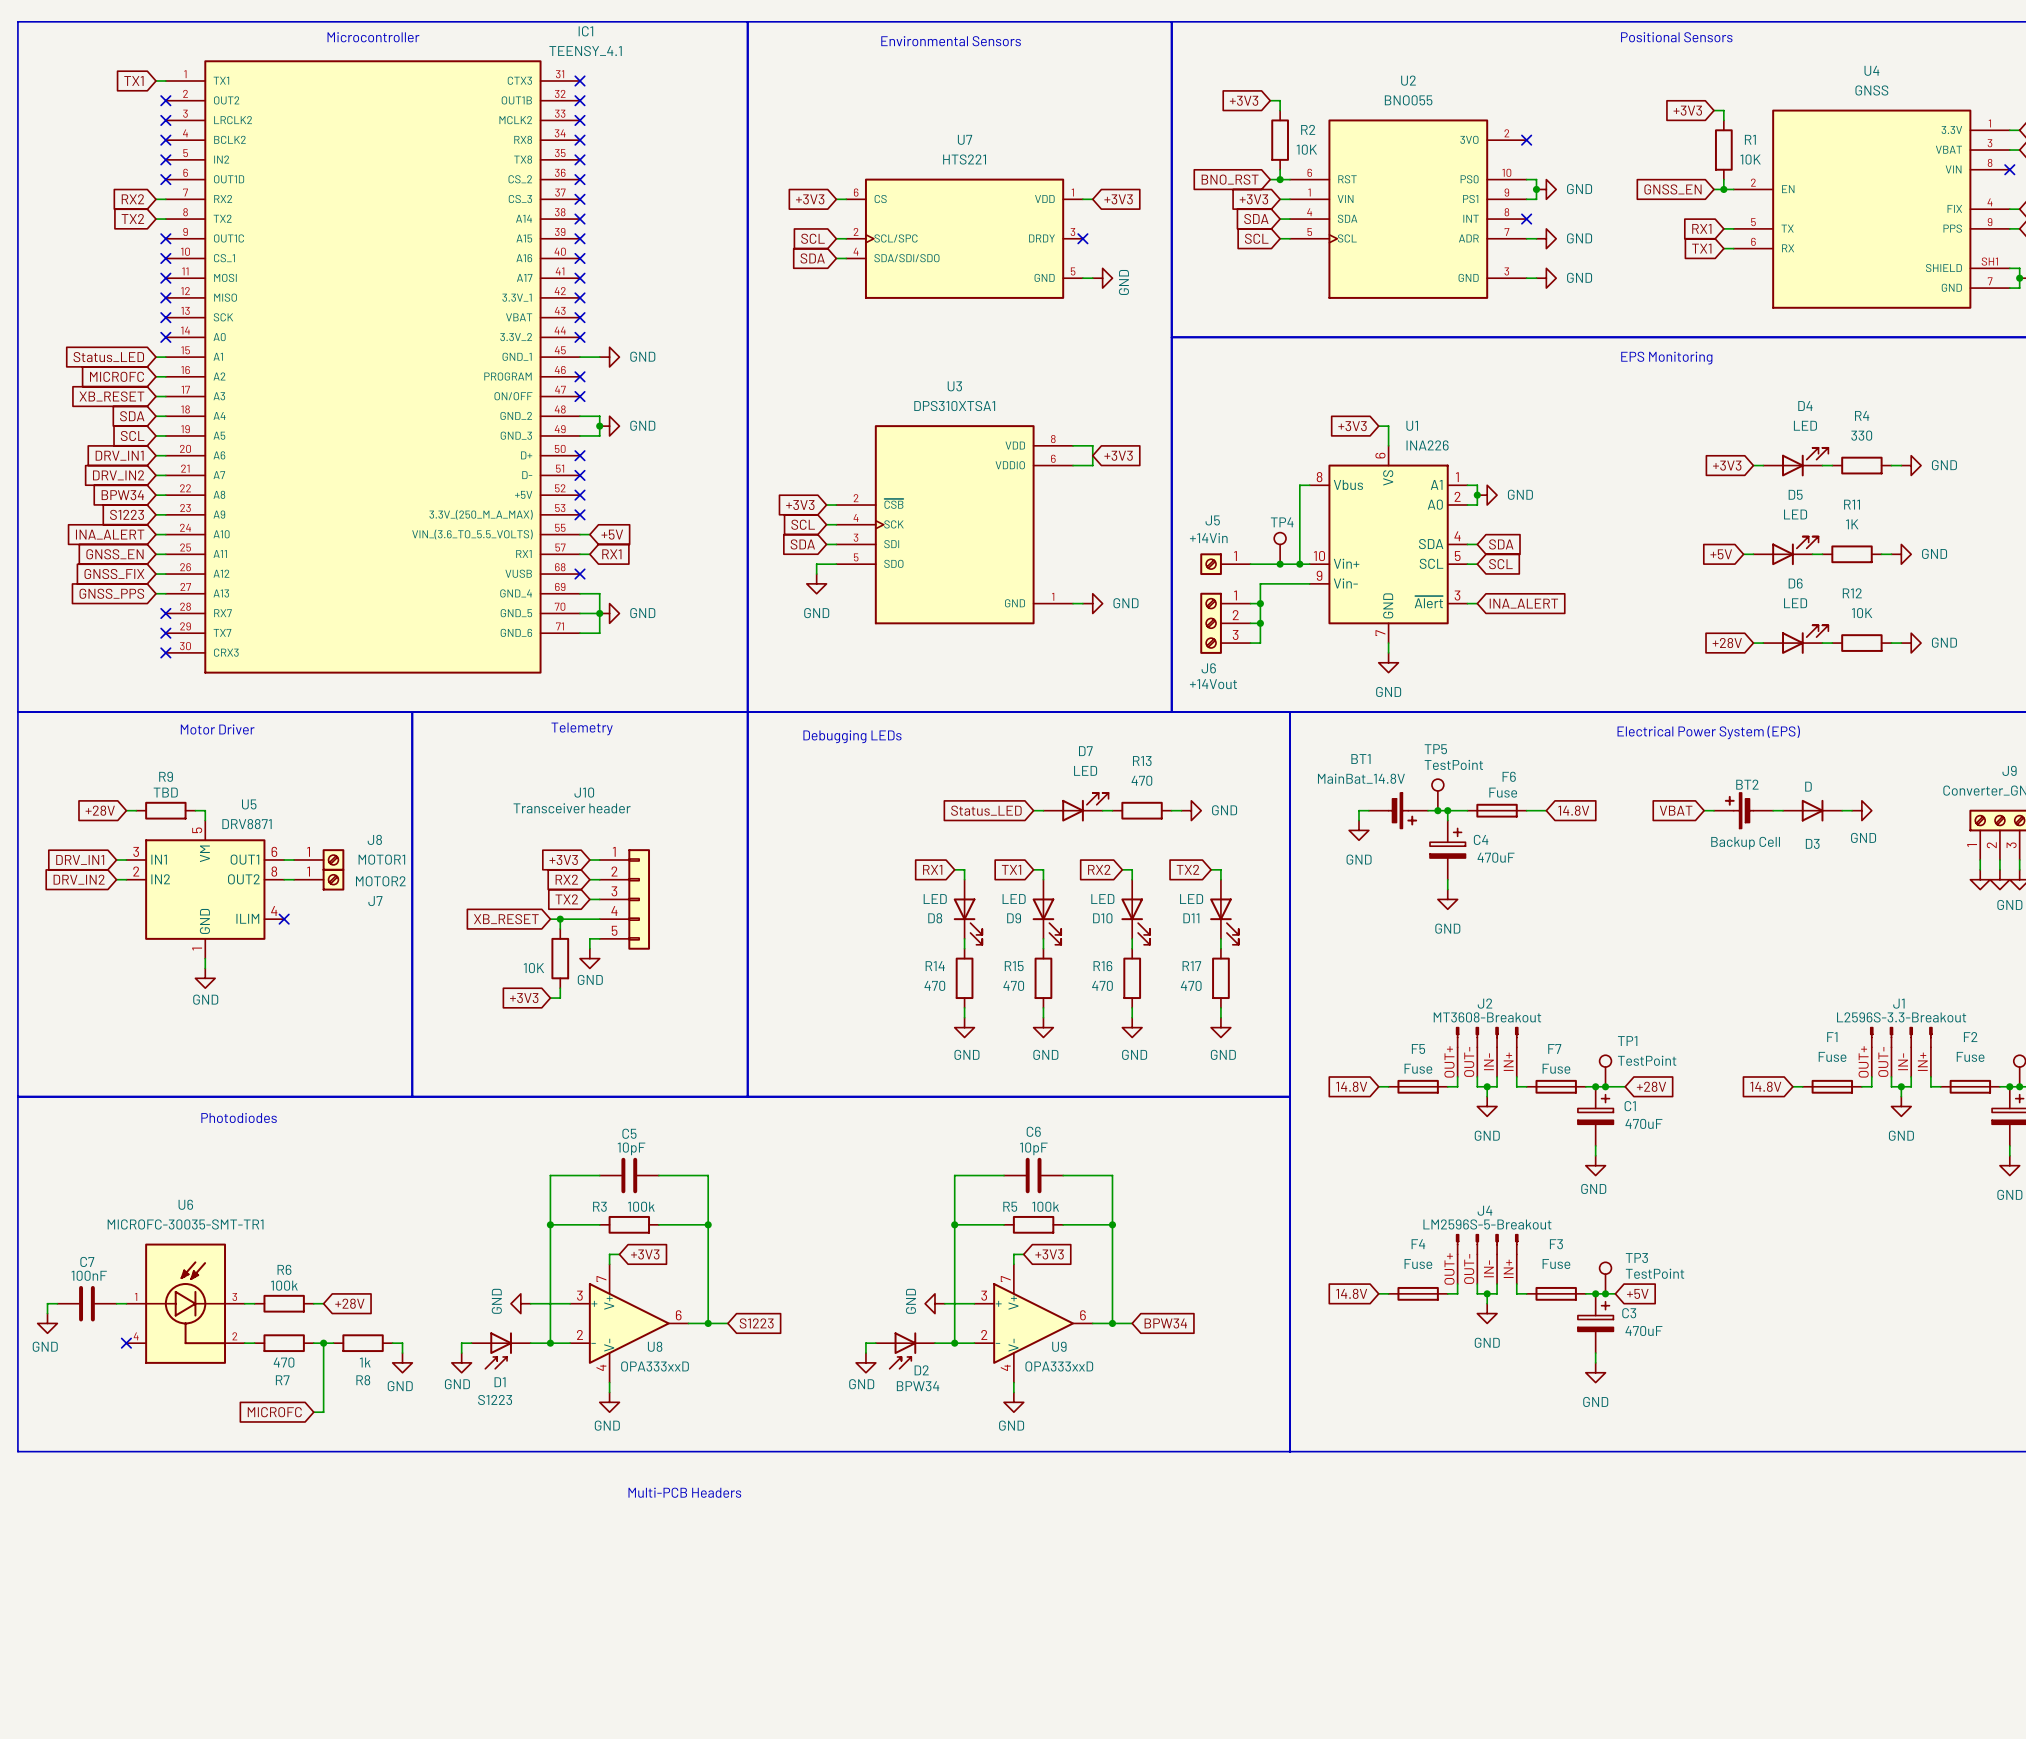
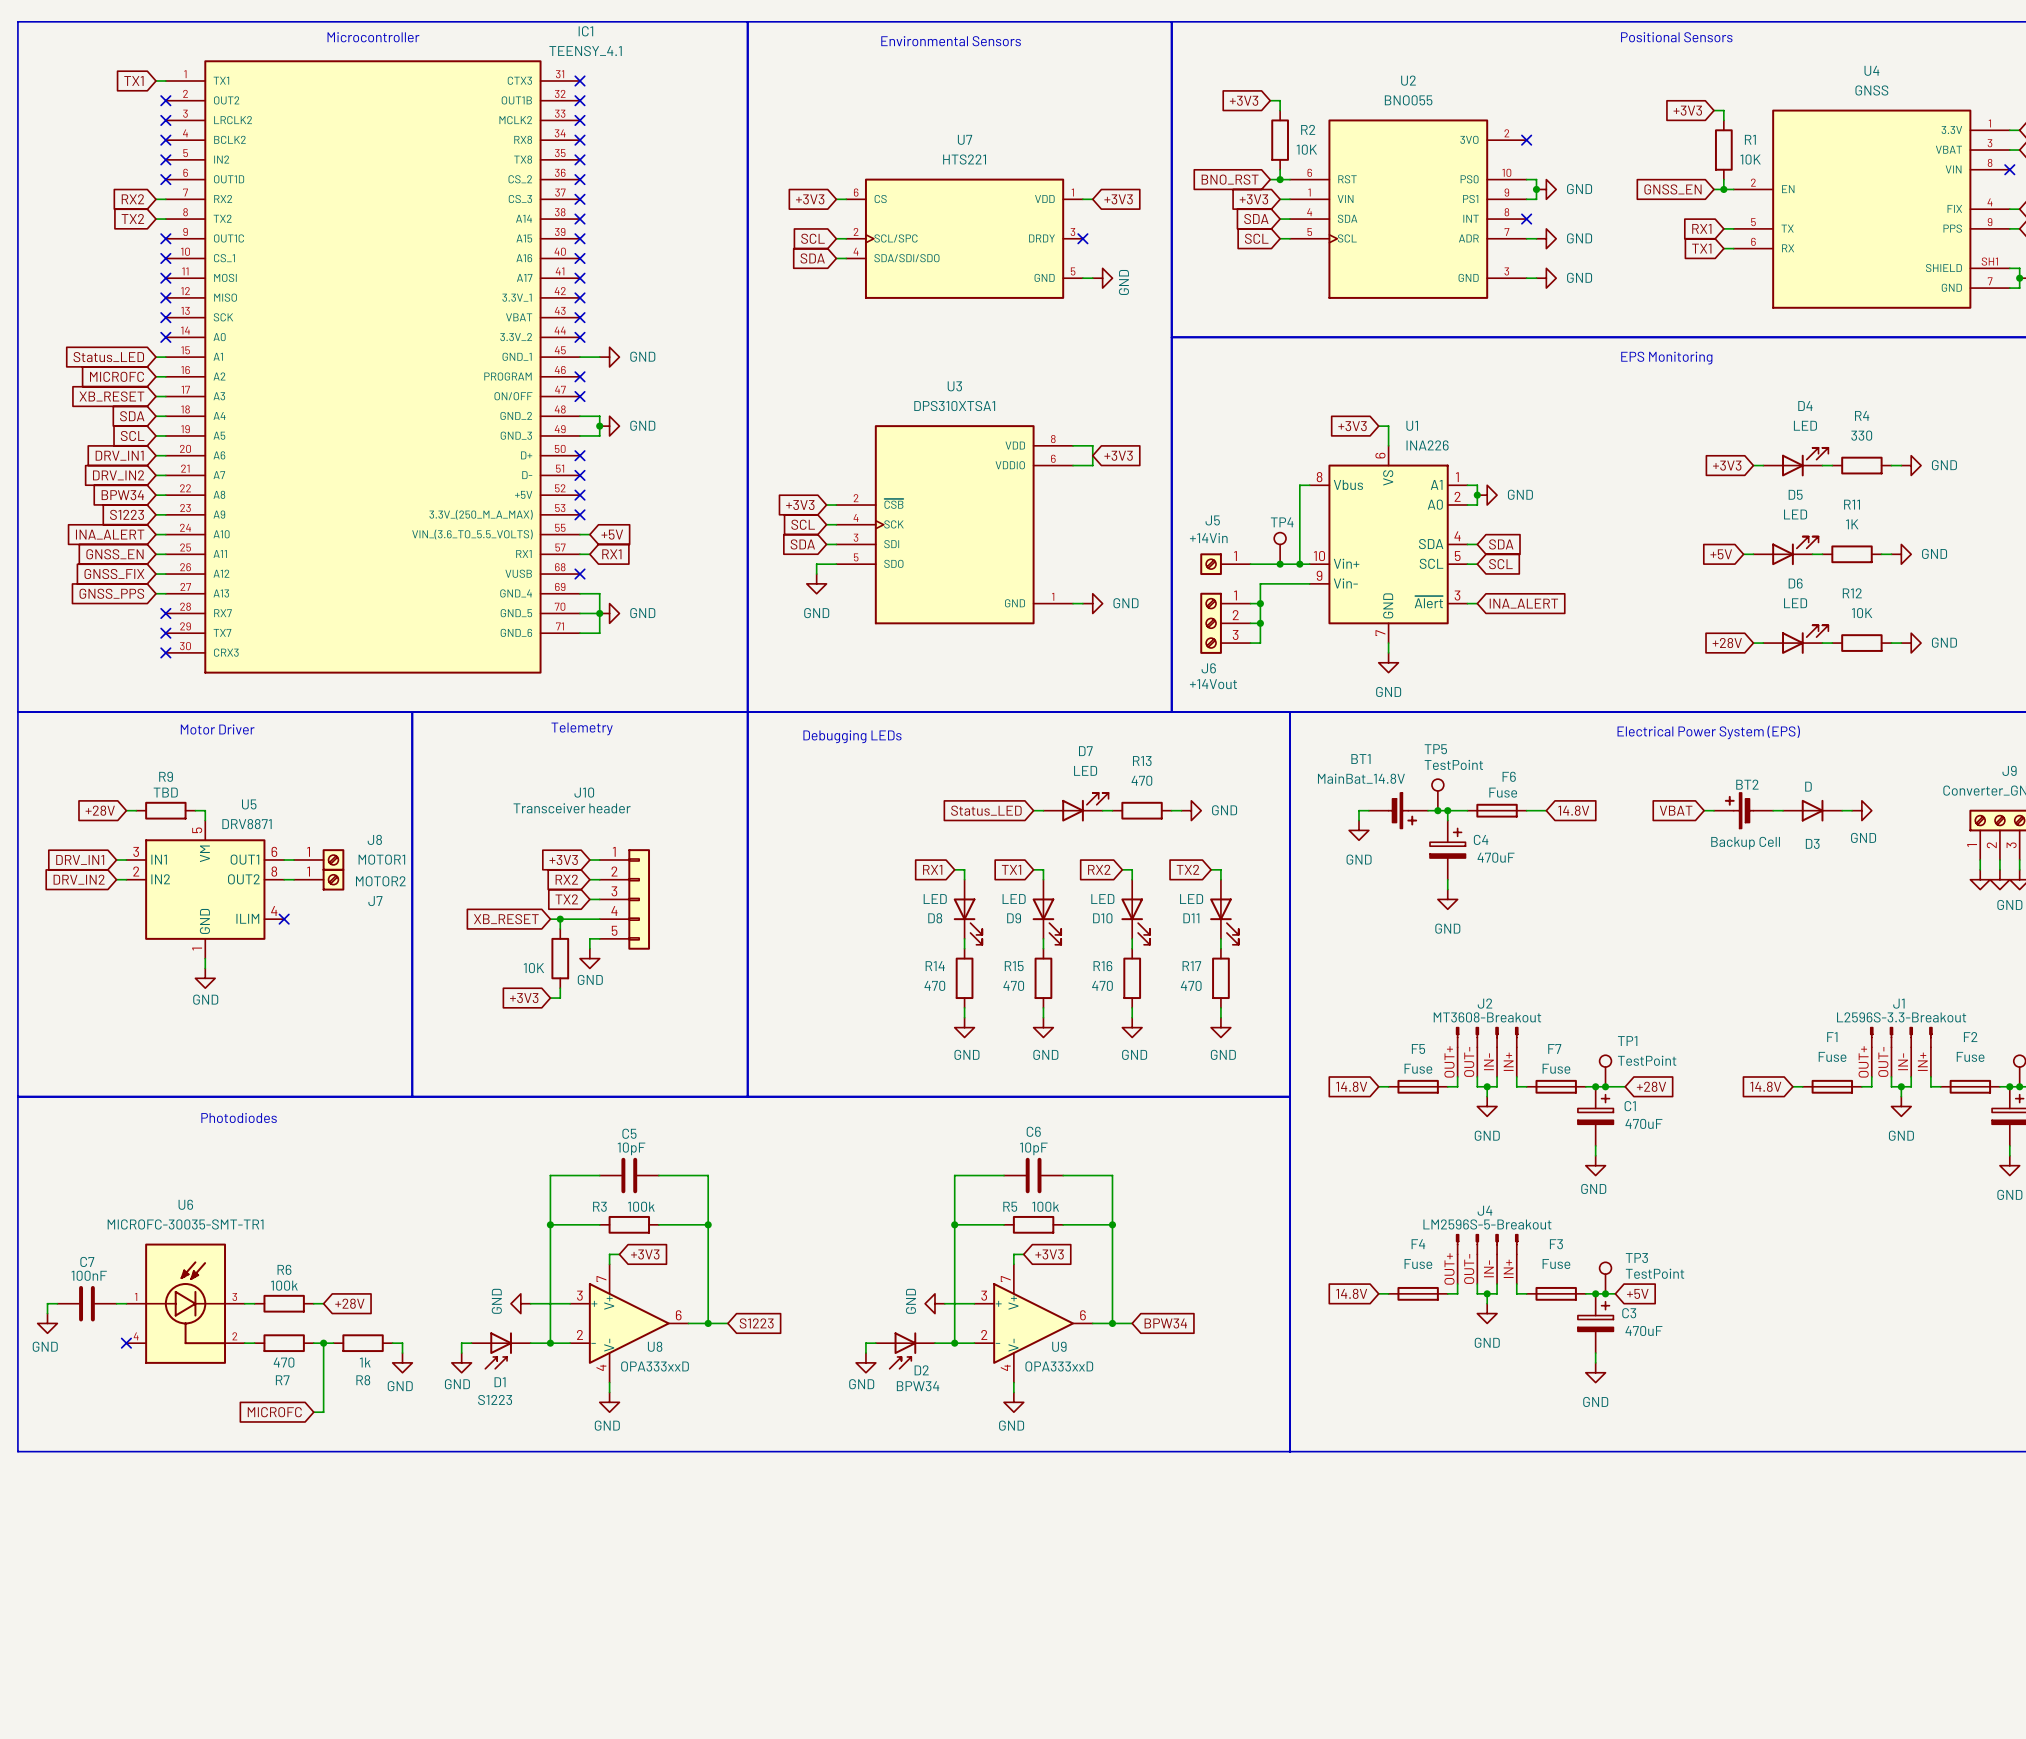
text: Multi-PCB Headers (684, 1492) -> none

